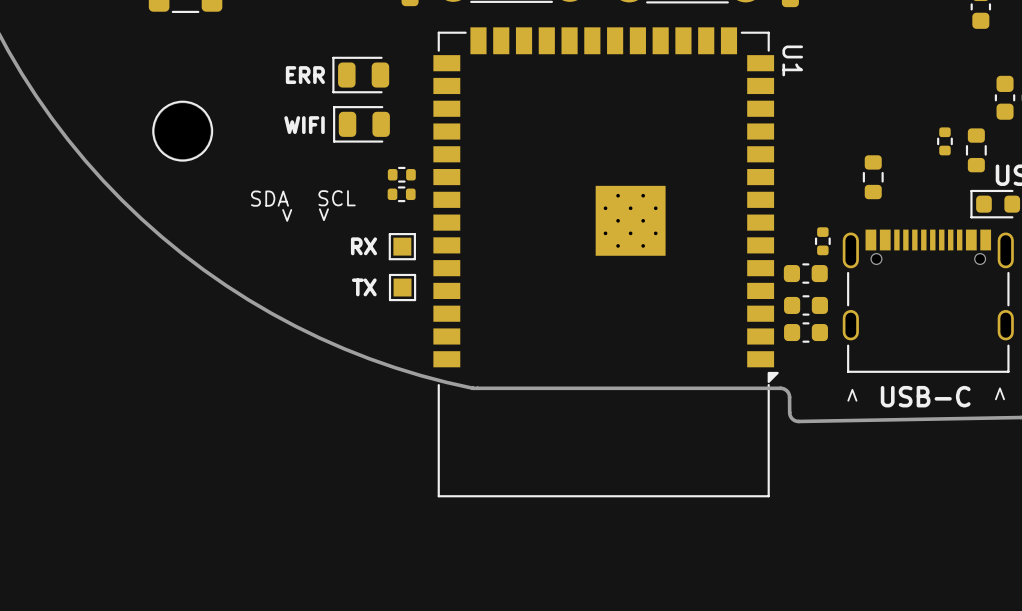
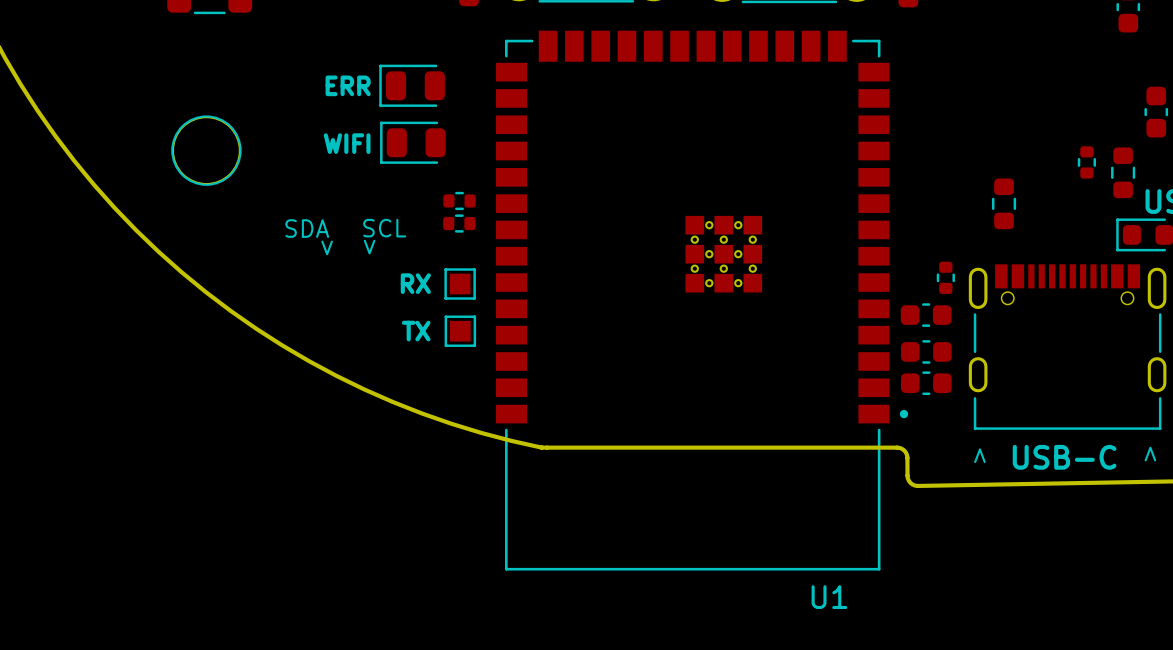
U1 footprint: [433, 27, 779, 498] -> [495, 30, 909, 571]
U1 name position: U1 (792, 60) -> U1 (829, 597)

